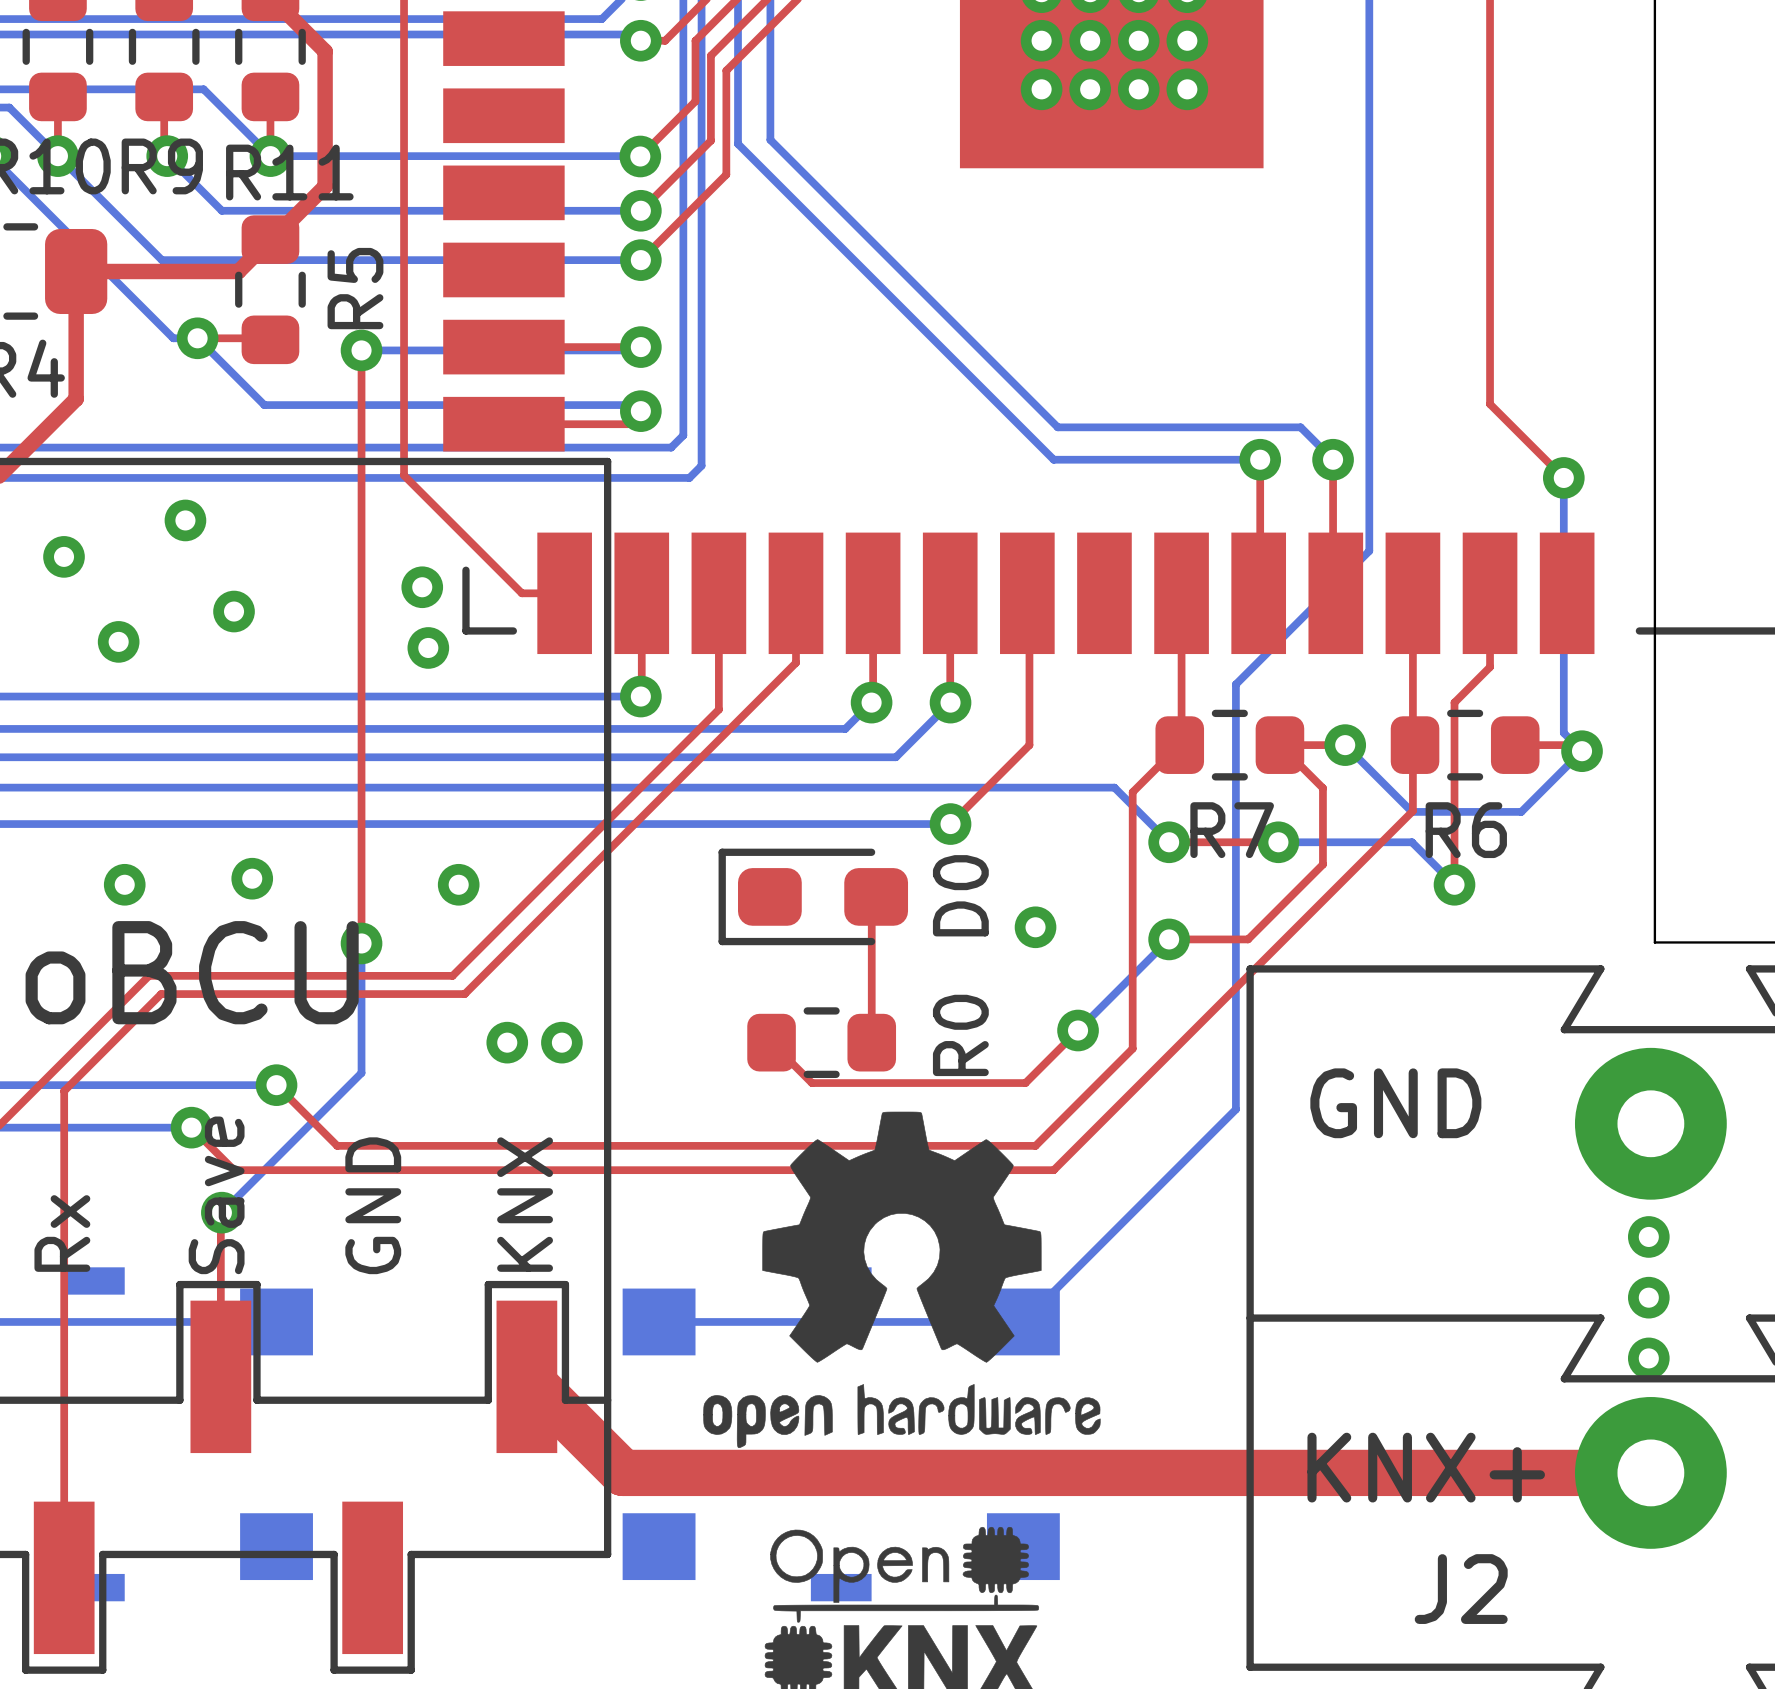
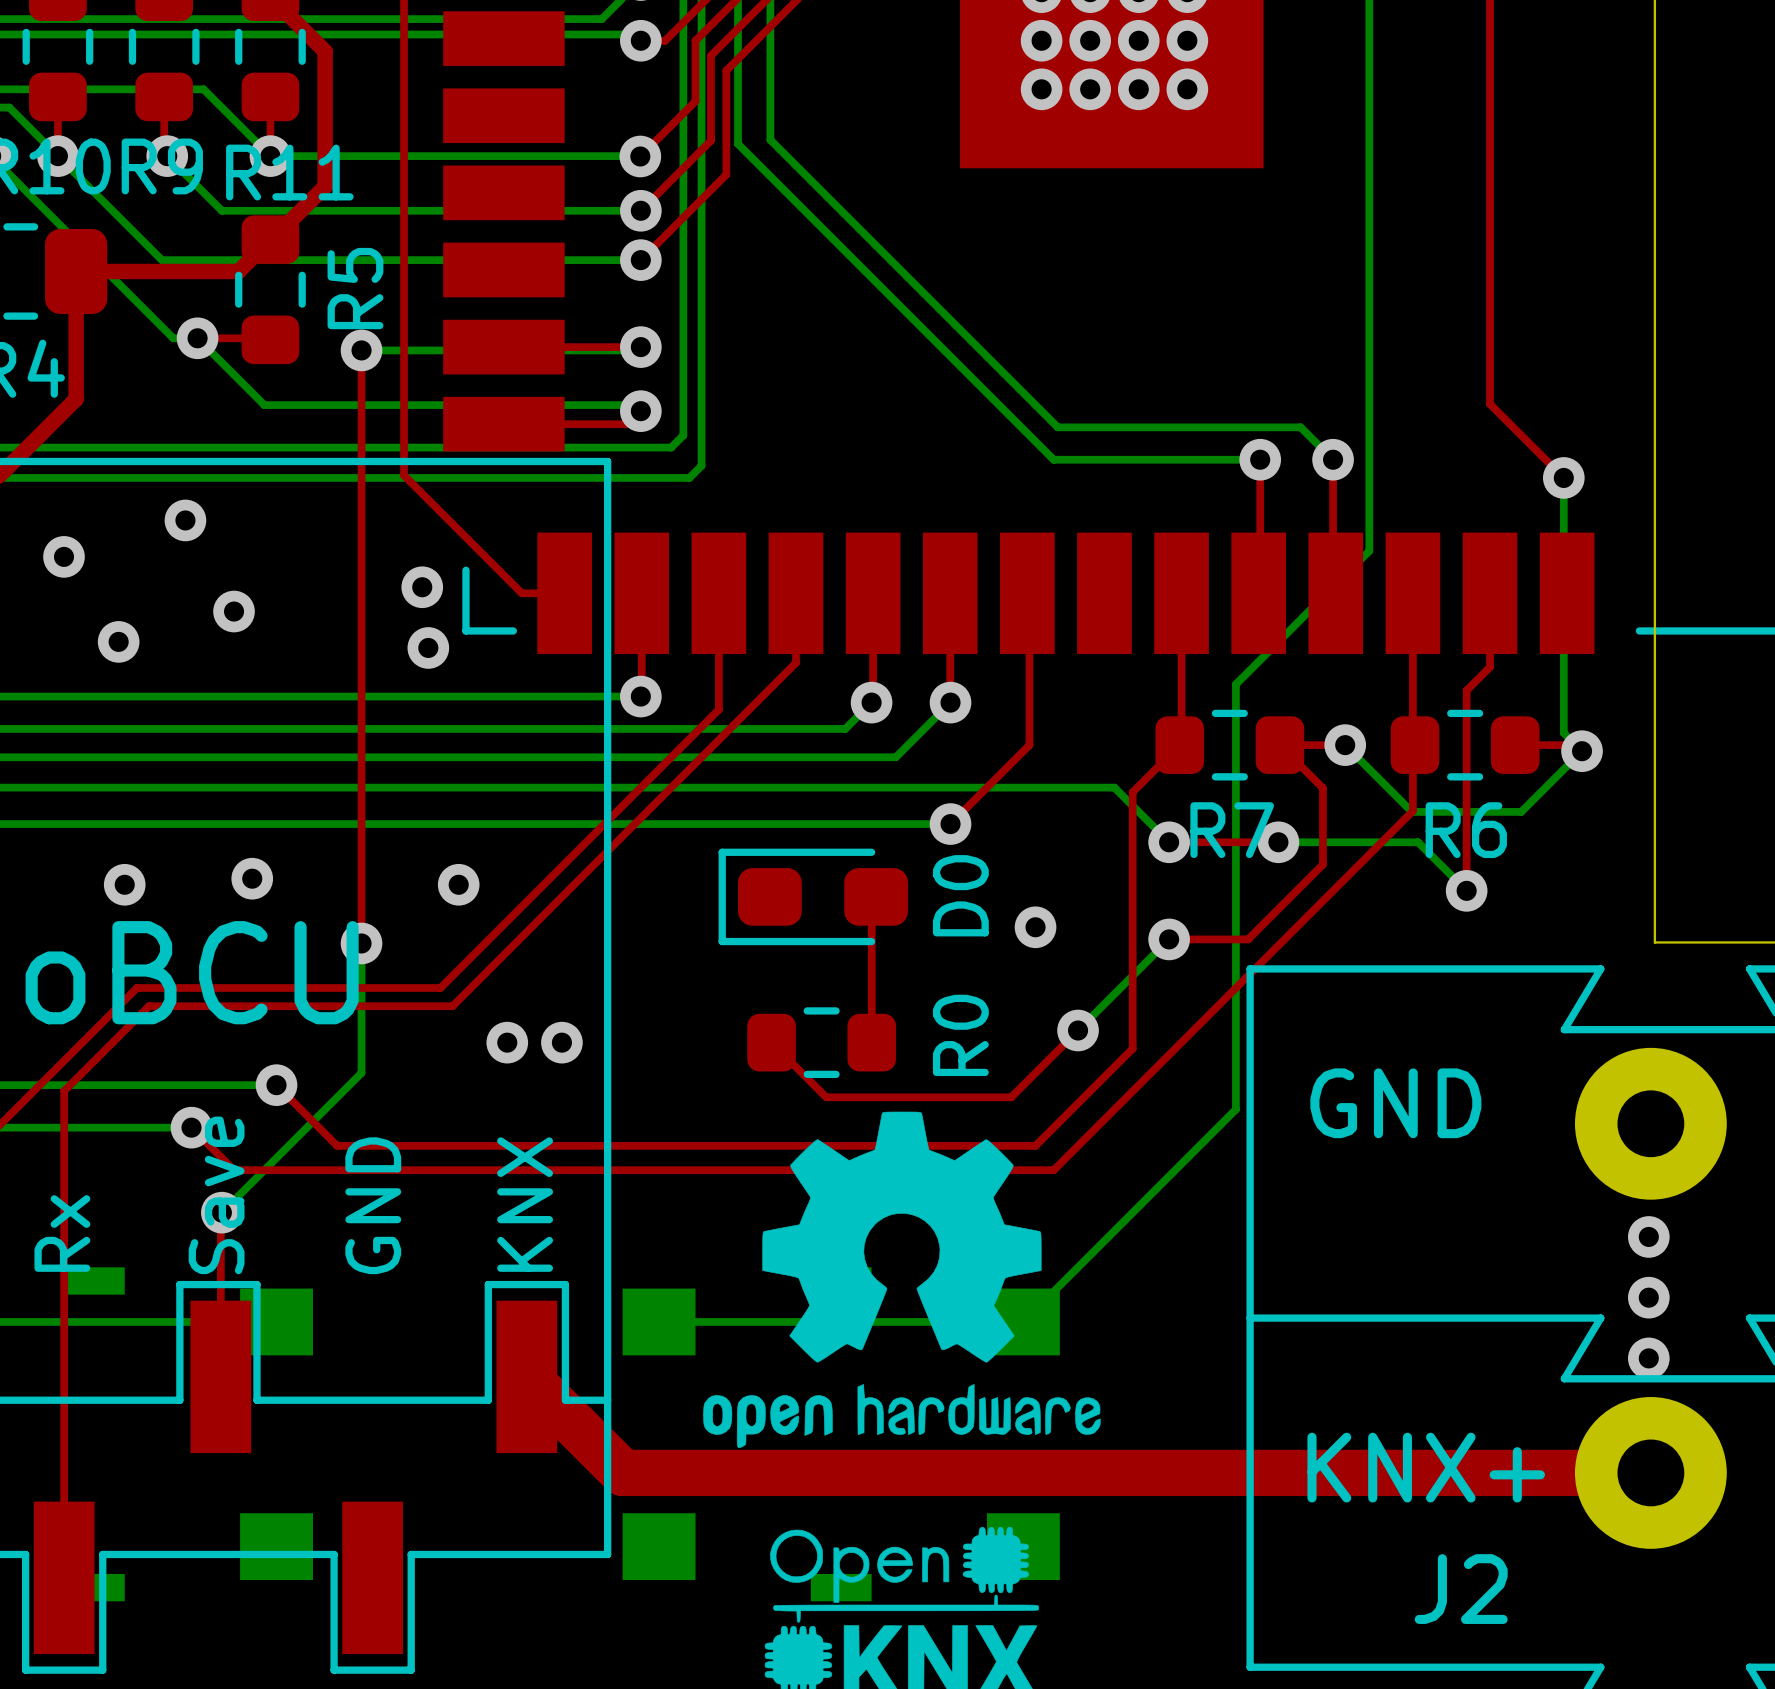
top track: (1466, 690) (1454, 702) (1454, 884) -> (1466, 690) (1466, 890)
bottom track: (1412, 842) (1454, 884) -> (1412, 842) (1418, 842) (1466, 890)
via position: (1454, 884) -> (1466, 890)
top track: (452, 975) (149, 975) (136, 988) -> (452, 975) (440, 988) (136, 988)
top track: (464, 994) (161, 994) (149, 1006) -> (464, 994) (452, 1006) (149, 1006)
top track: (811, 1083) (1025, 1083) -> (811, 1083) (826, 1097) (1011, 1097) (1025, 1083)

